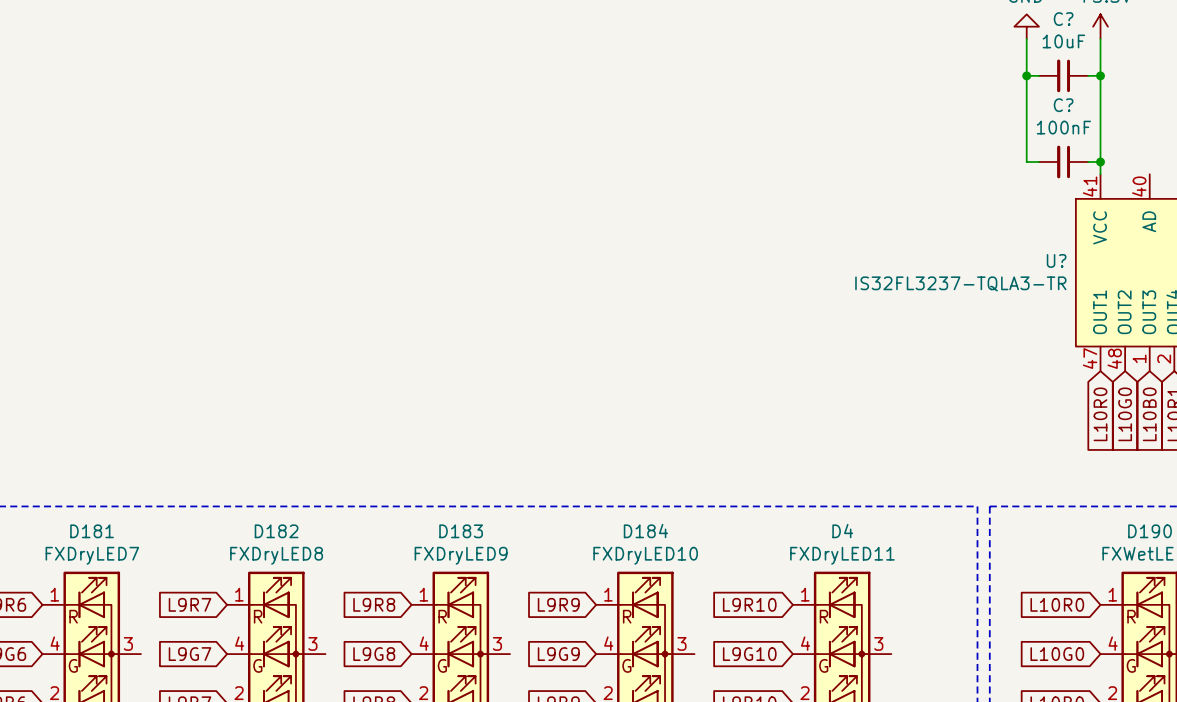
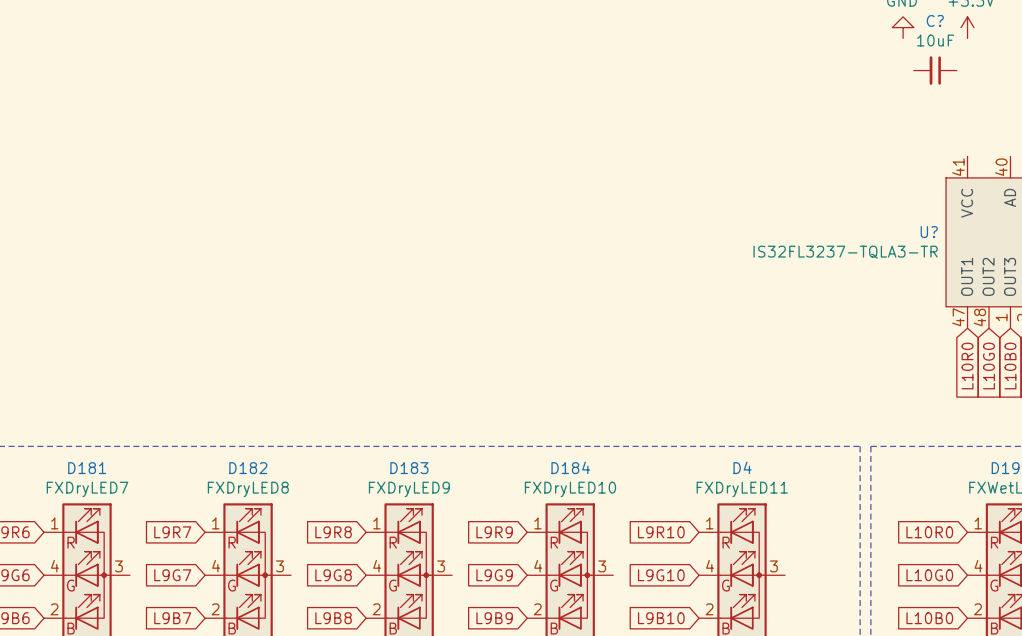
wire: (1026, 38) (1026, 161) (1039, 161) -> none
wire: (1100, 38) (1100, 174) -> none
wire: (1026, 75) (1039, 75) -> none
junction: (1026, 75) -> none
wire: (1088, 75) (1100, 75) -> none
junction: (1100, 75) -> none
C?: 100nF (1063, 161) -> none
wire: (1088, 161) (1100, 161) -> none
junction: (1100, 161) -> none

